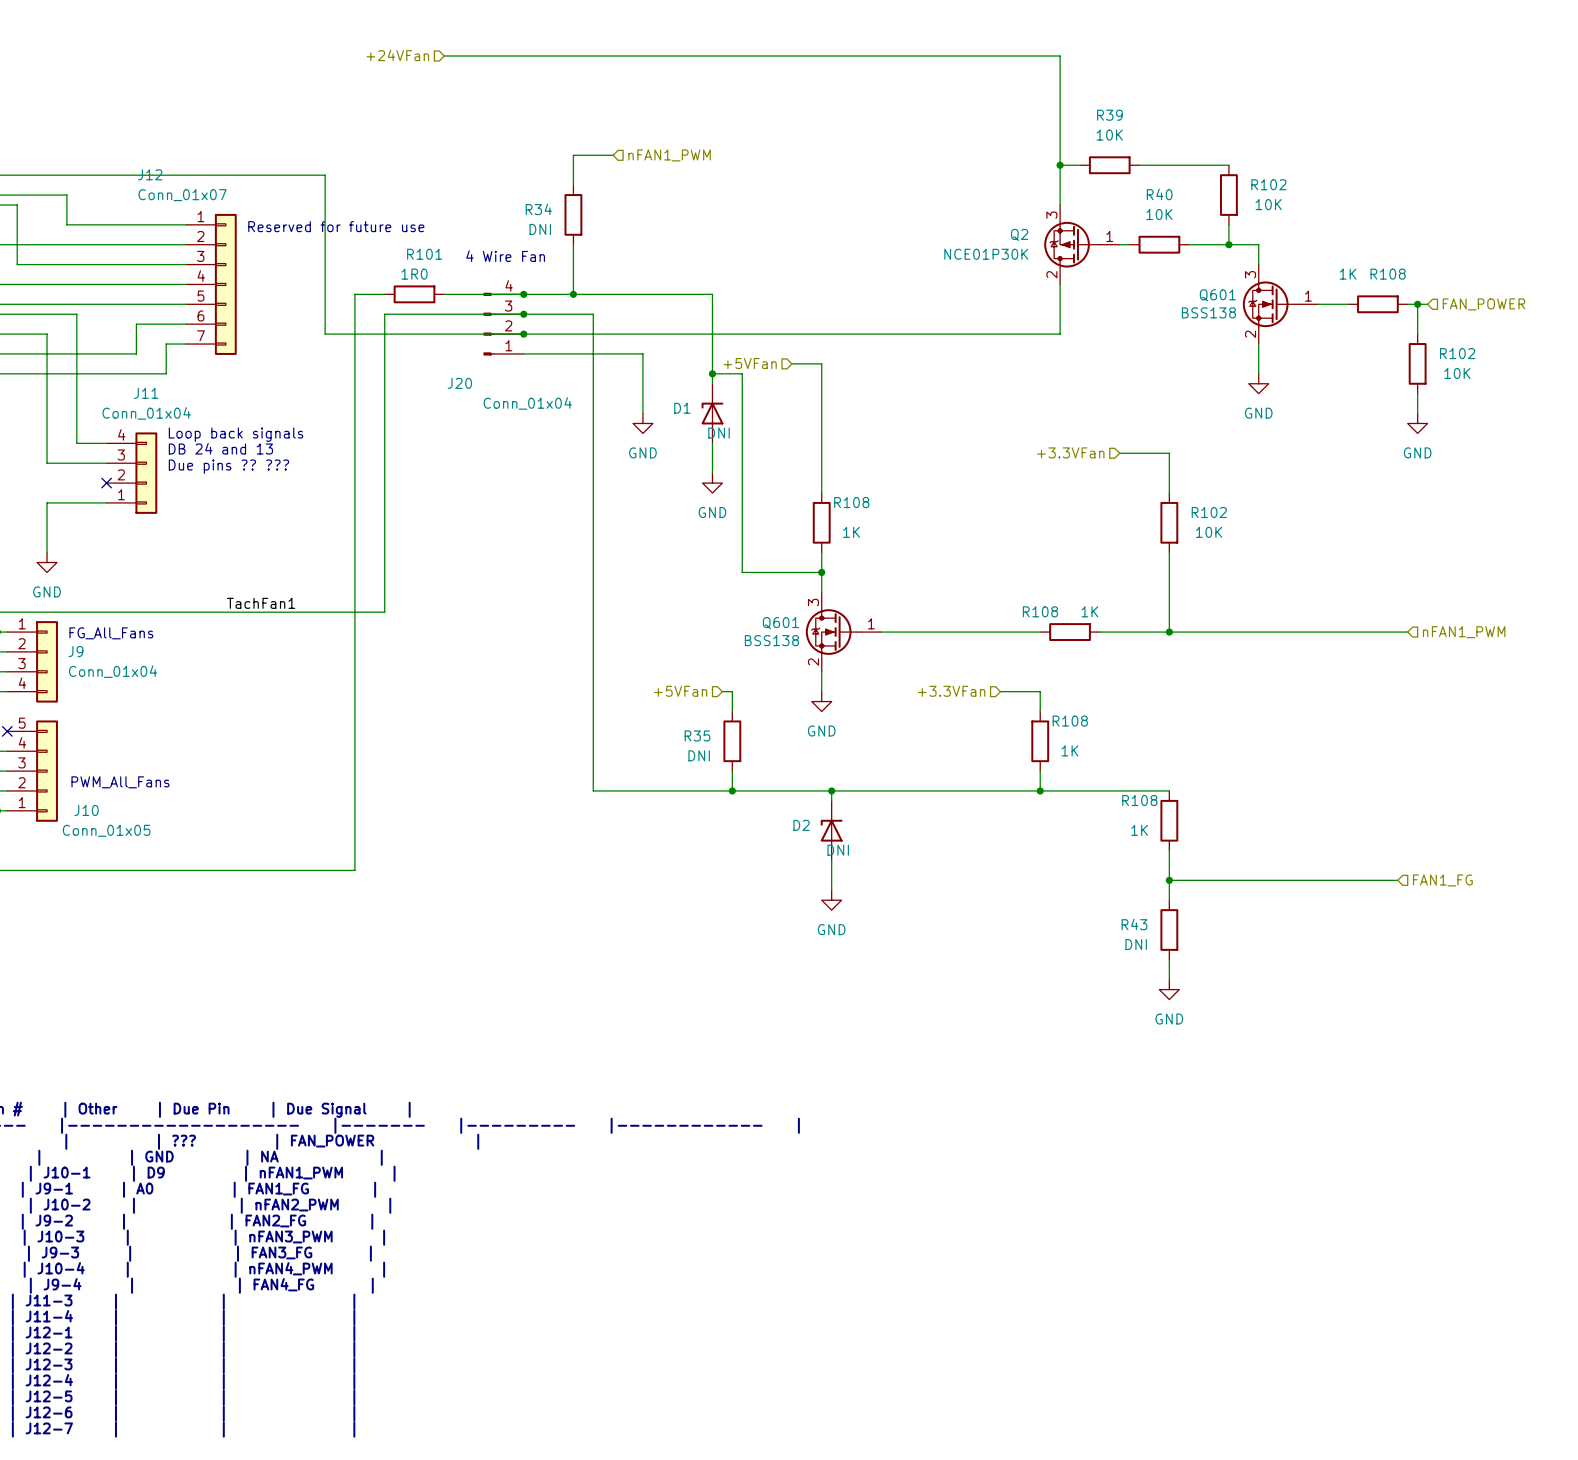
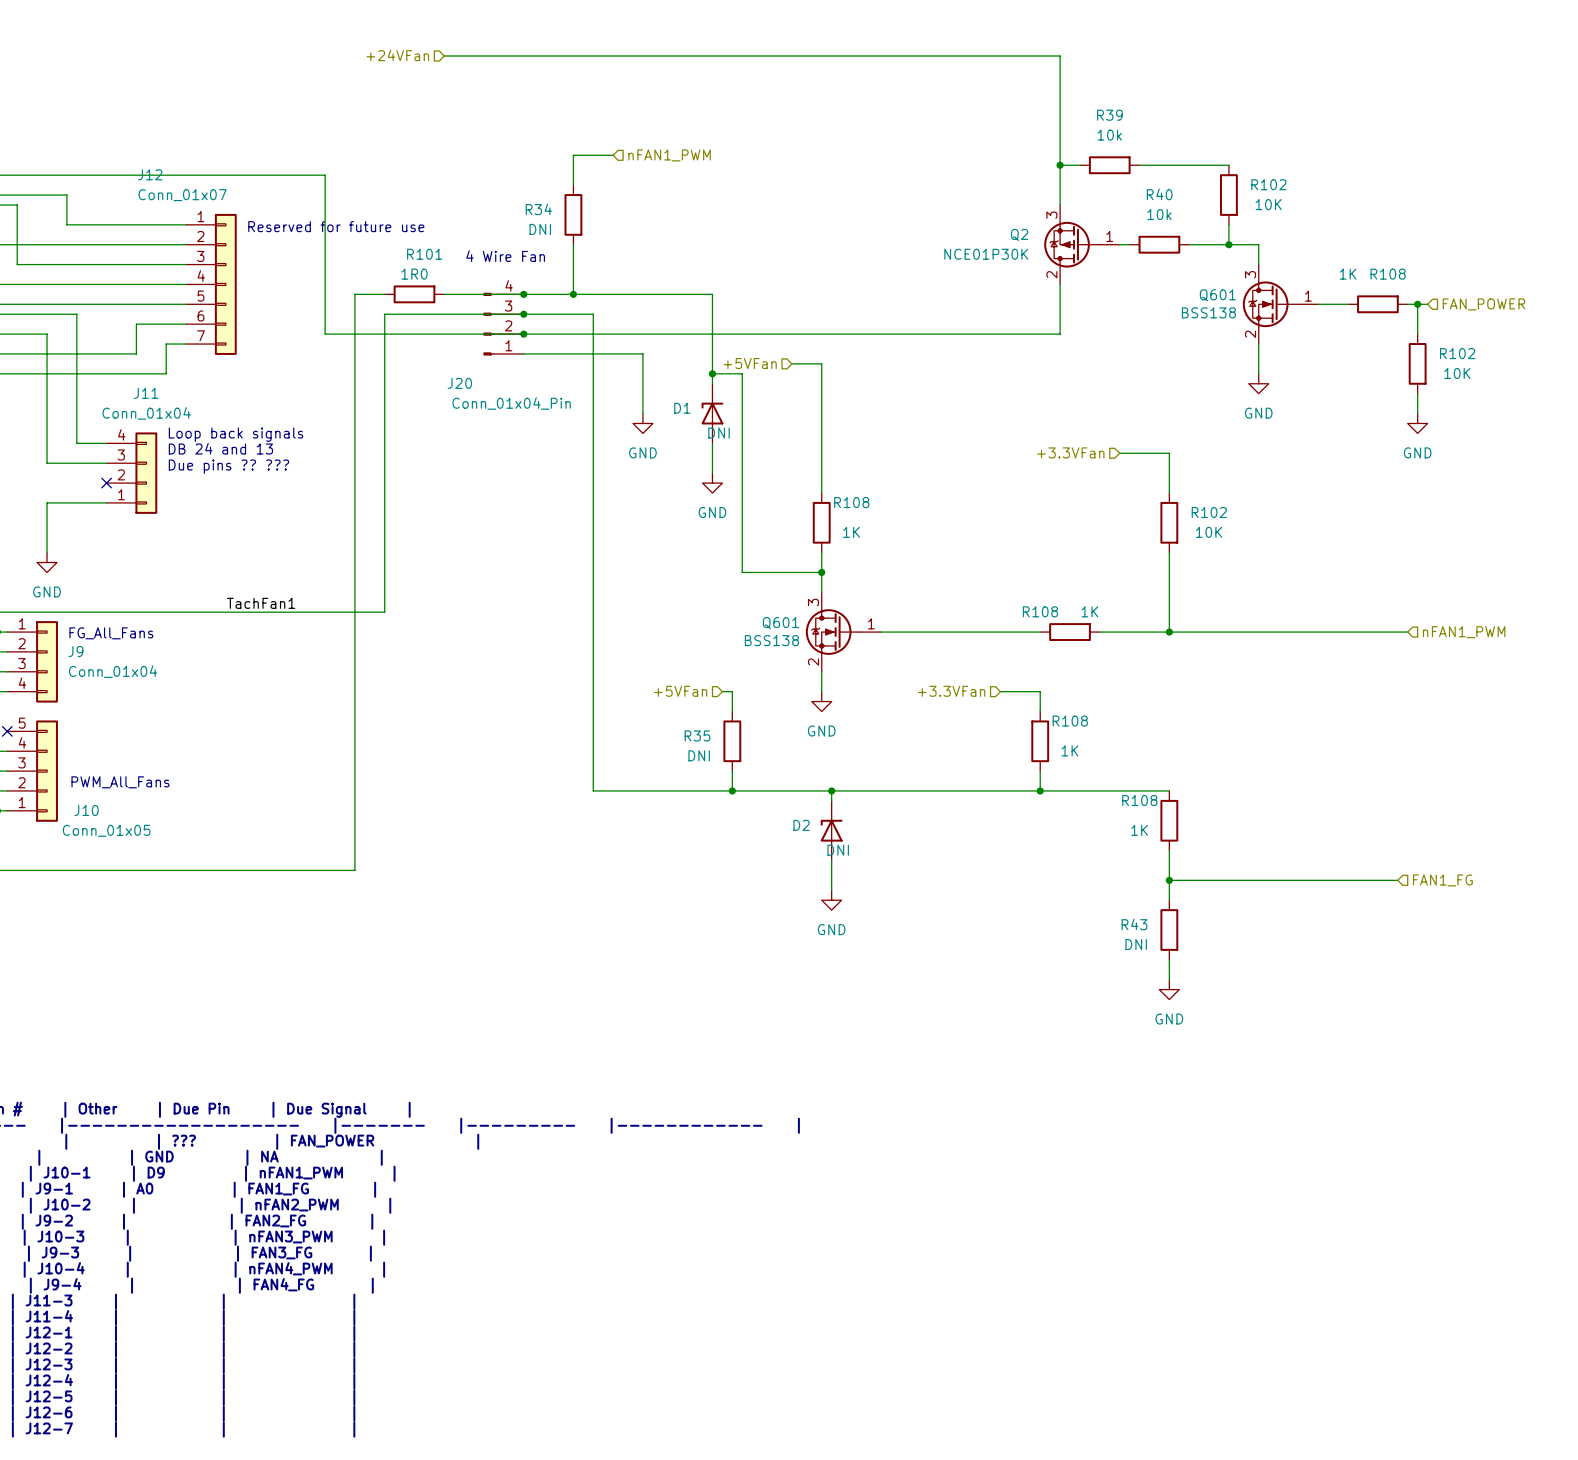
R39 value: 10K (1109, 135) -> 10k (1109, 135)
R40 value: 10K (1159, 214) -> 10k (1159, 214)
J20 value: Conn_01x04 (527, 403) -> Conn_01x04_Pin (511, 403)

